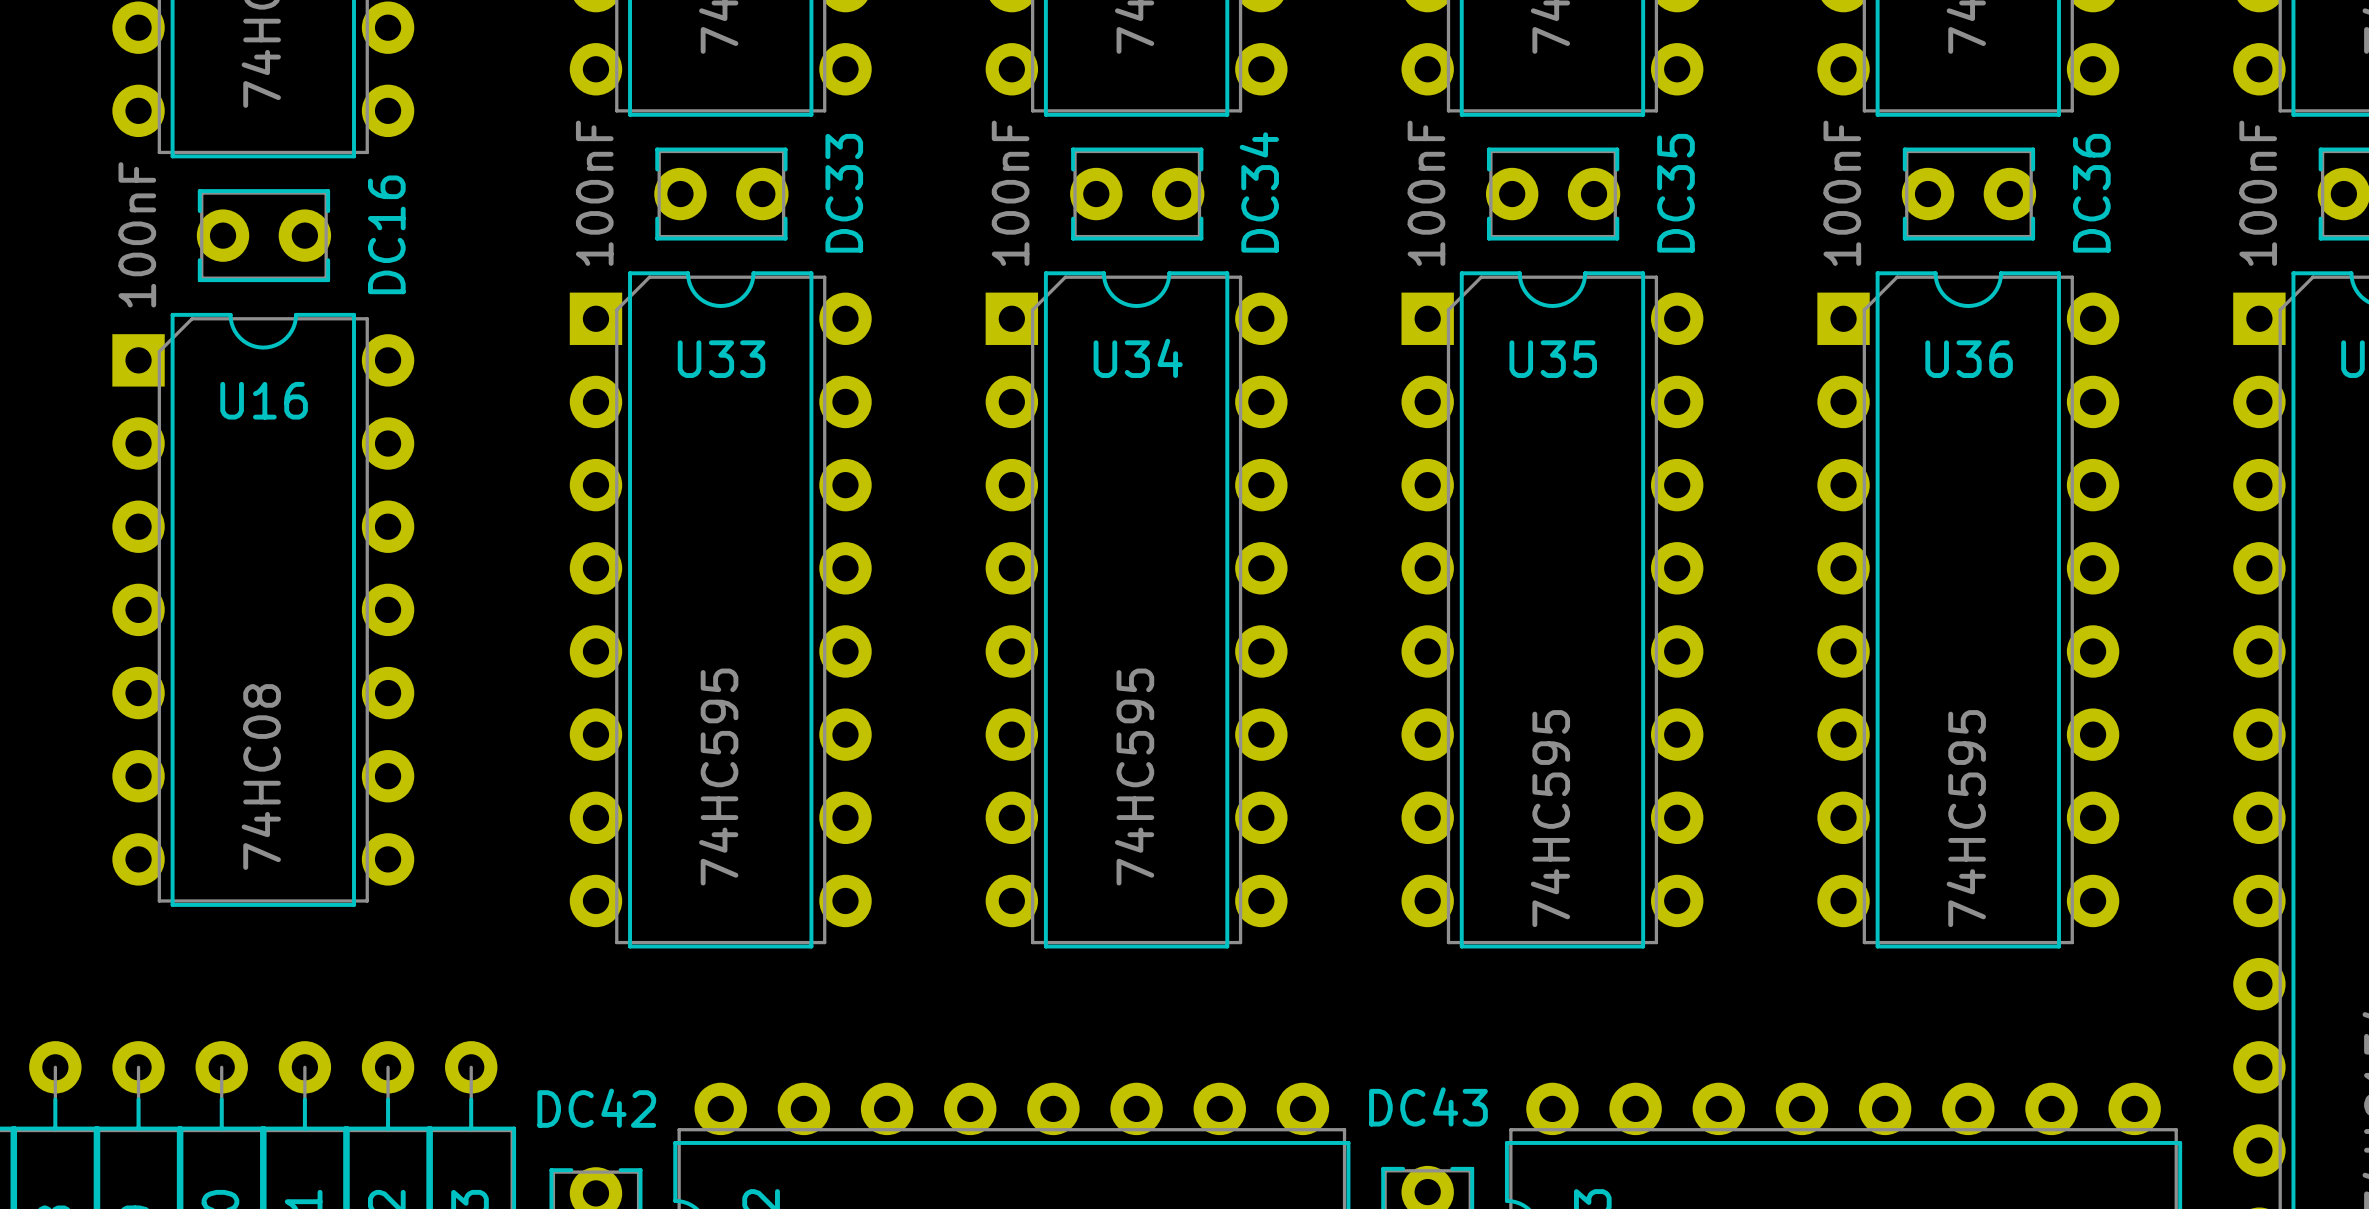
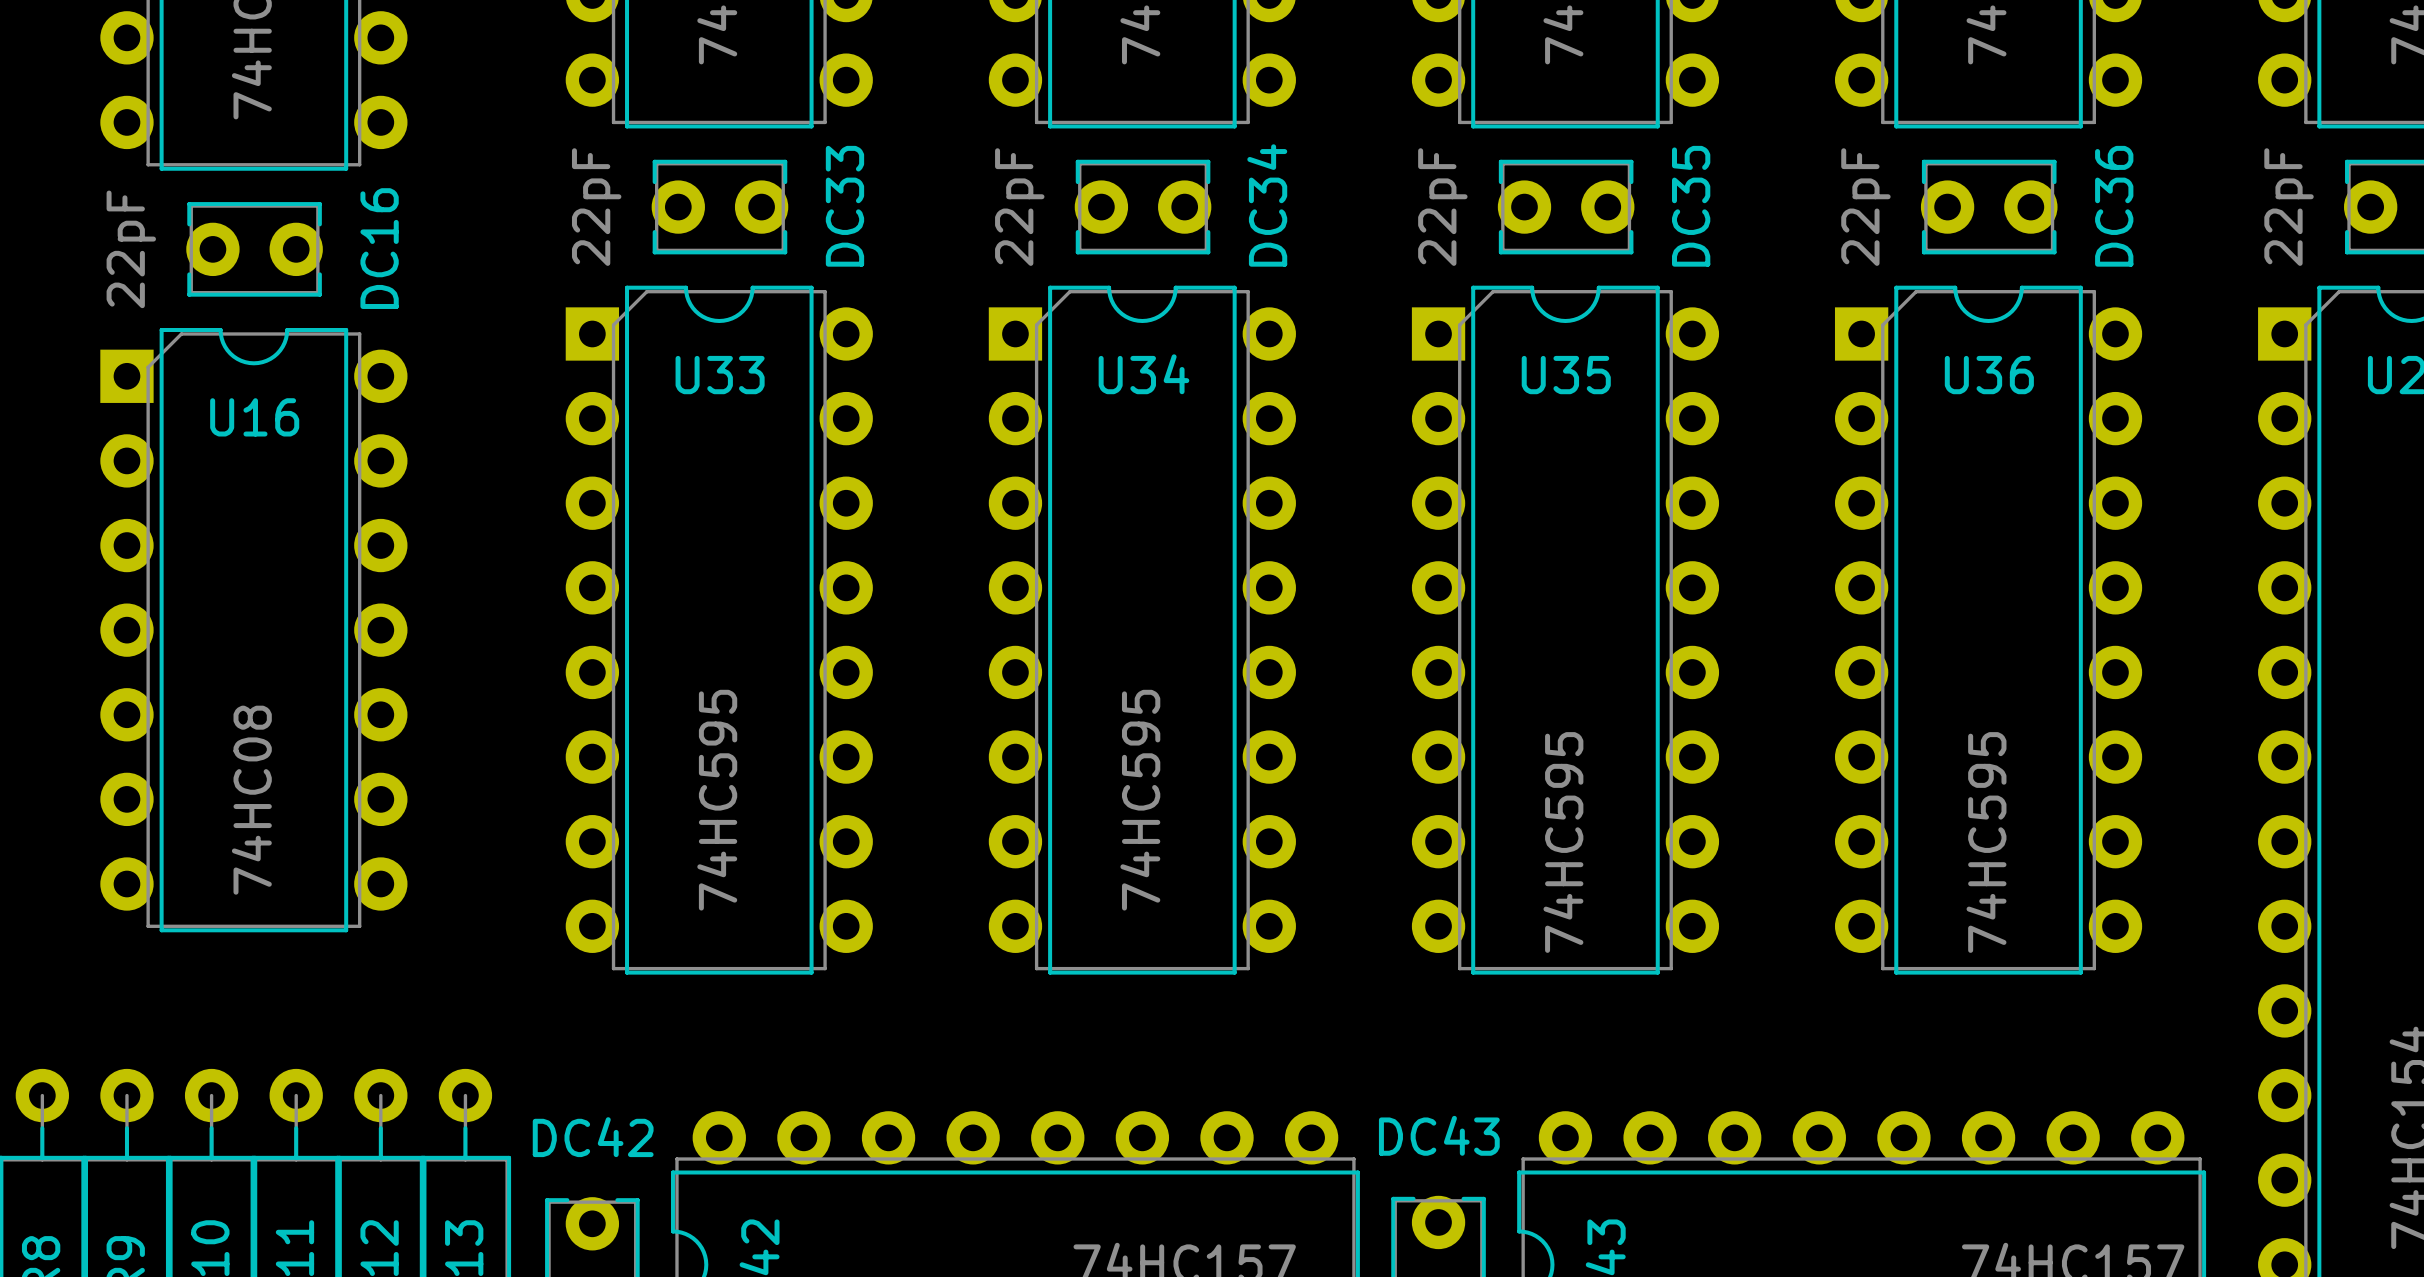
DC33 value: 100nF (594, 193) -> 22pF (596, 207)
DC34 value: 100nF (1010, 193) -> 22pF (1019, 207)
DC35 value: 100nF (1426, 193) -> 22pF (1442, 207)
DC36 value: 100nF (1842, 193) -> 22pF (1865, 207)
part value: 100nF (2258, 193) -> 22pF (2289, 207)
DC16 value: 100nF (137, 234) -> 22pF (131, 249)

